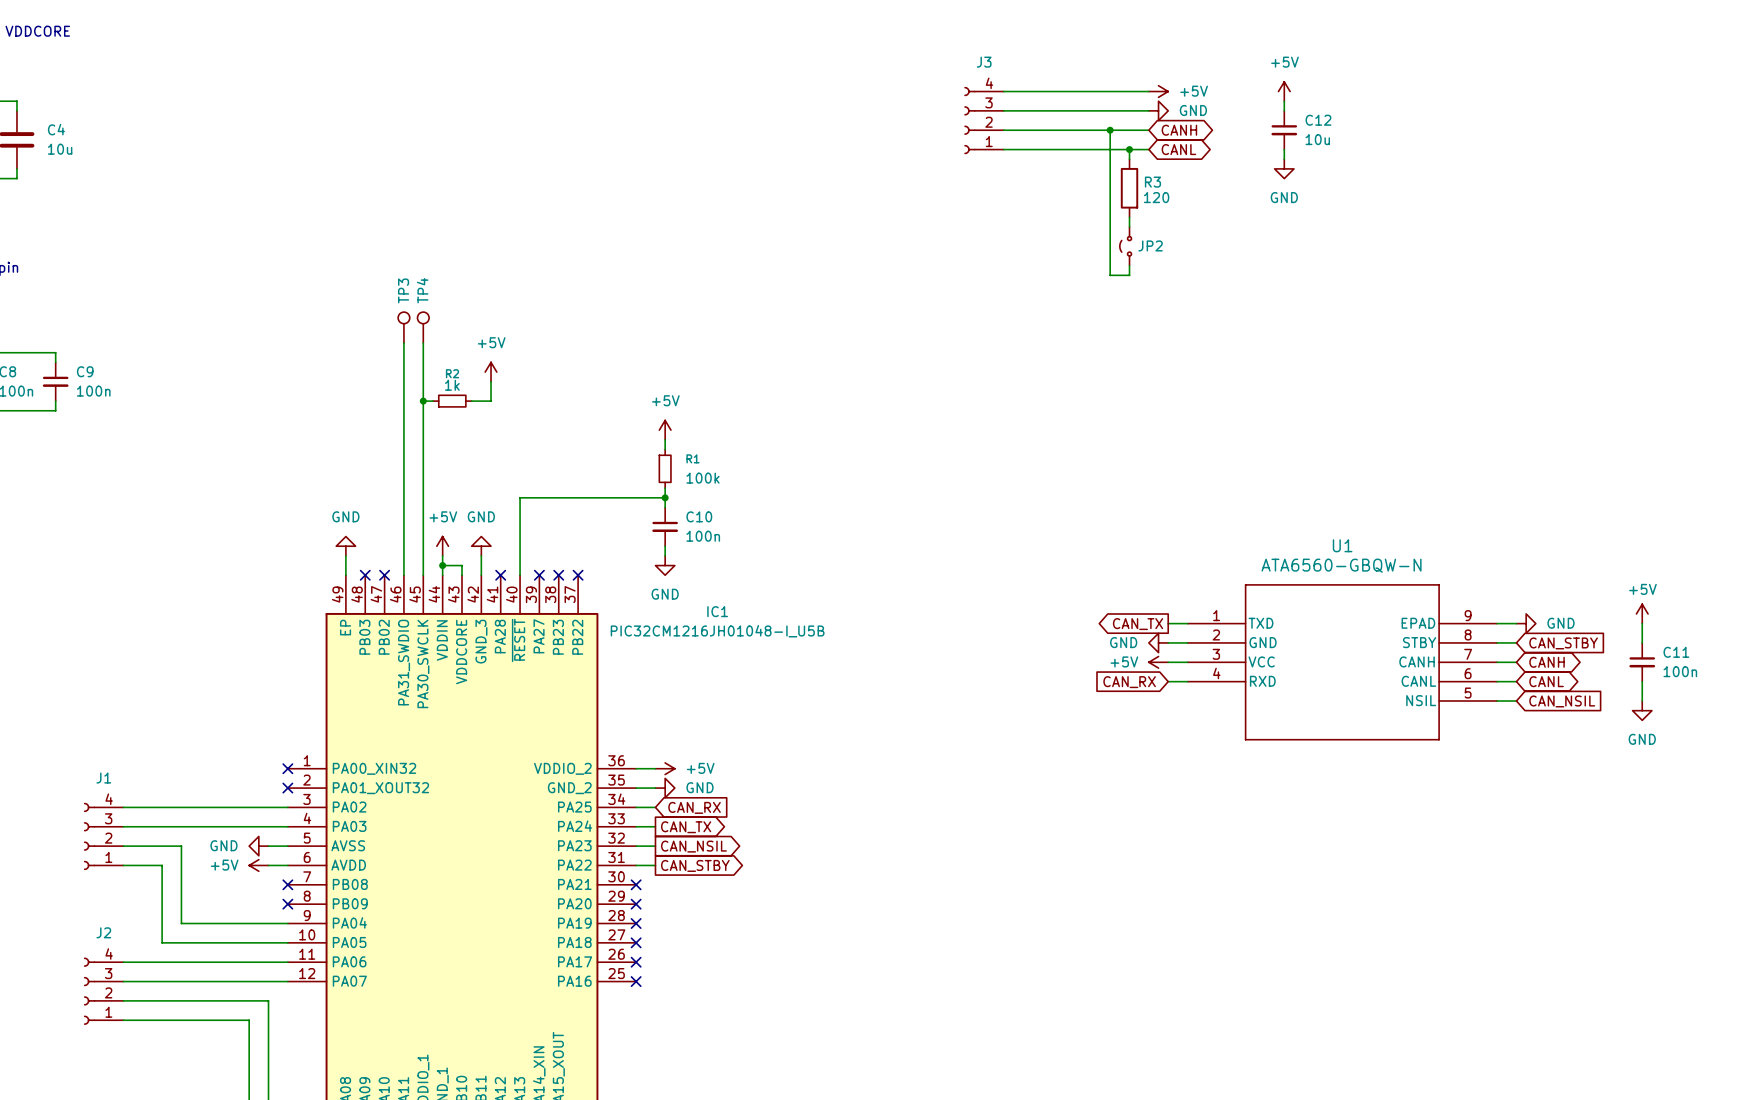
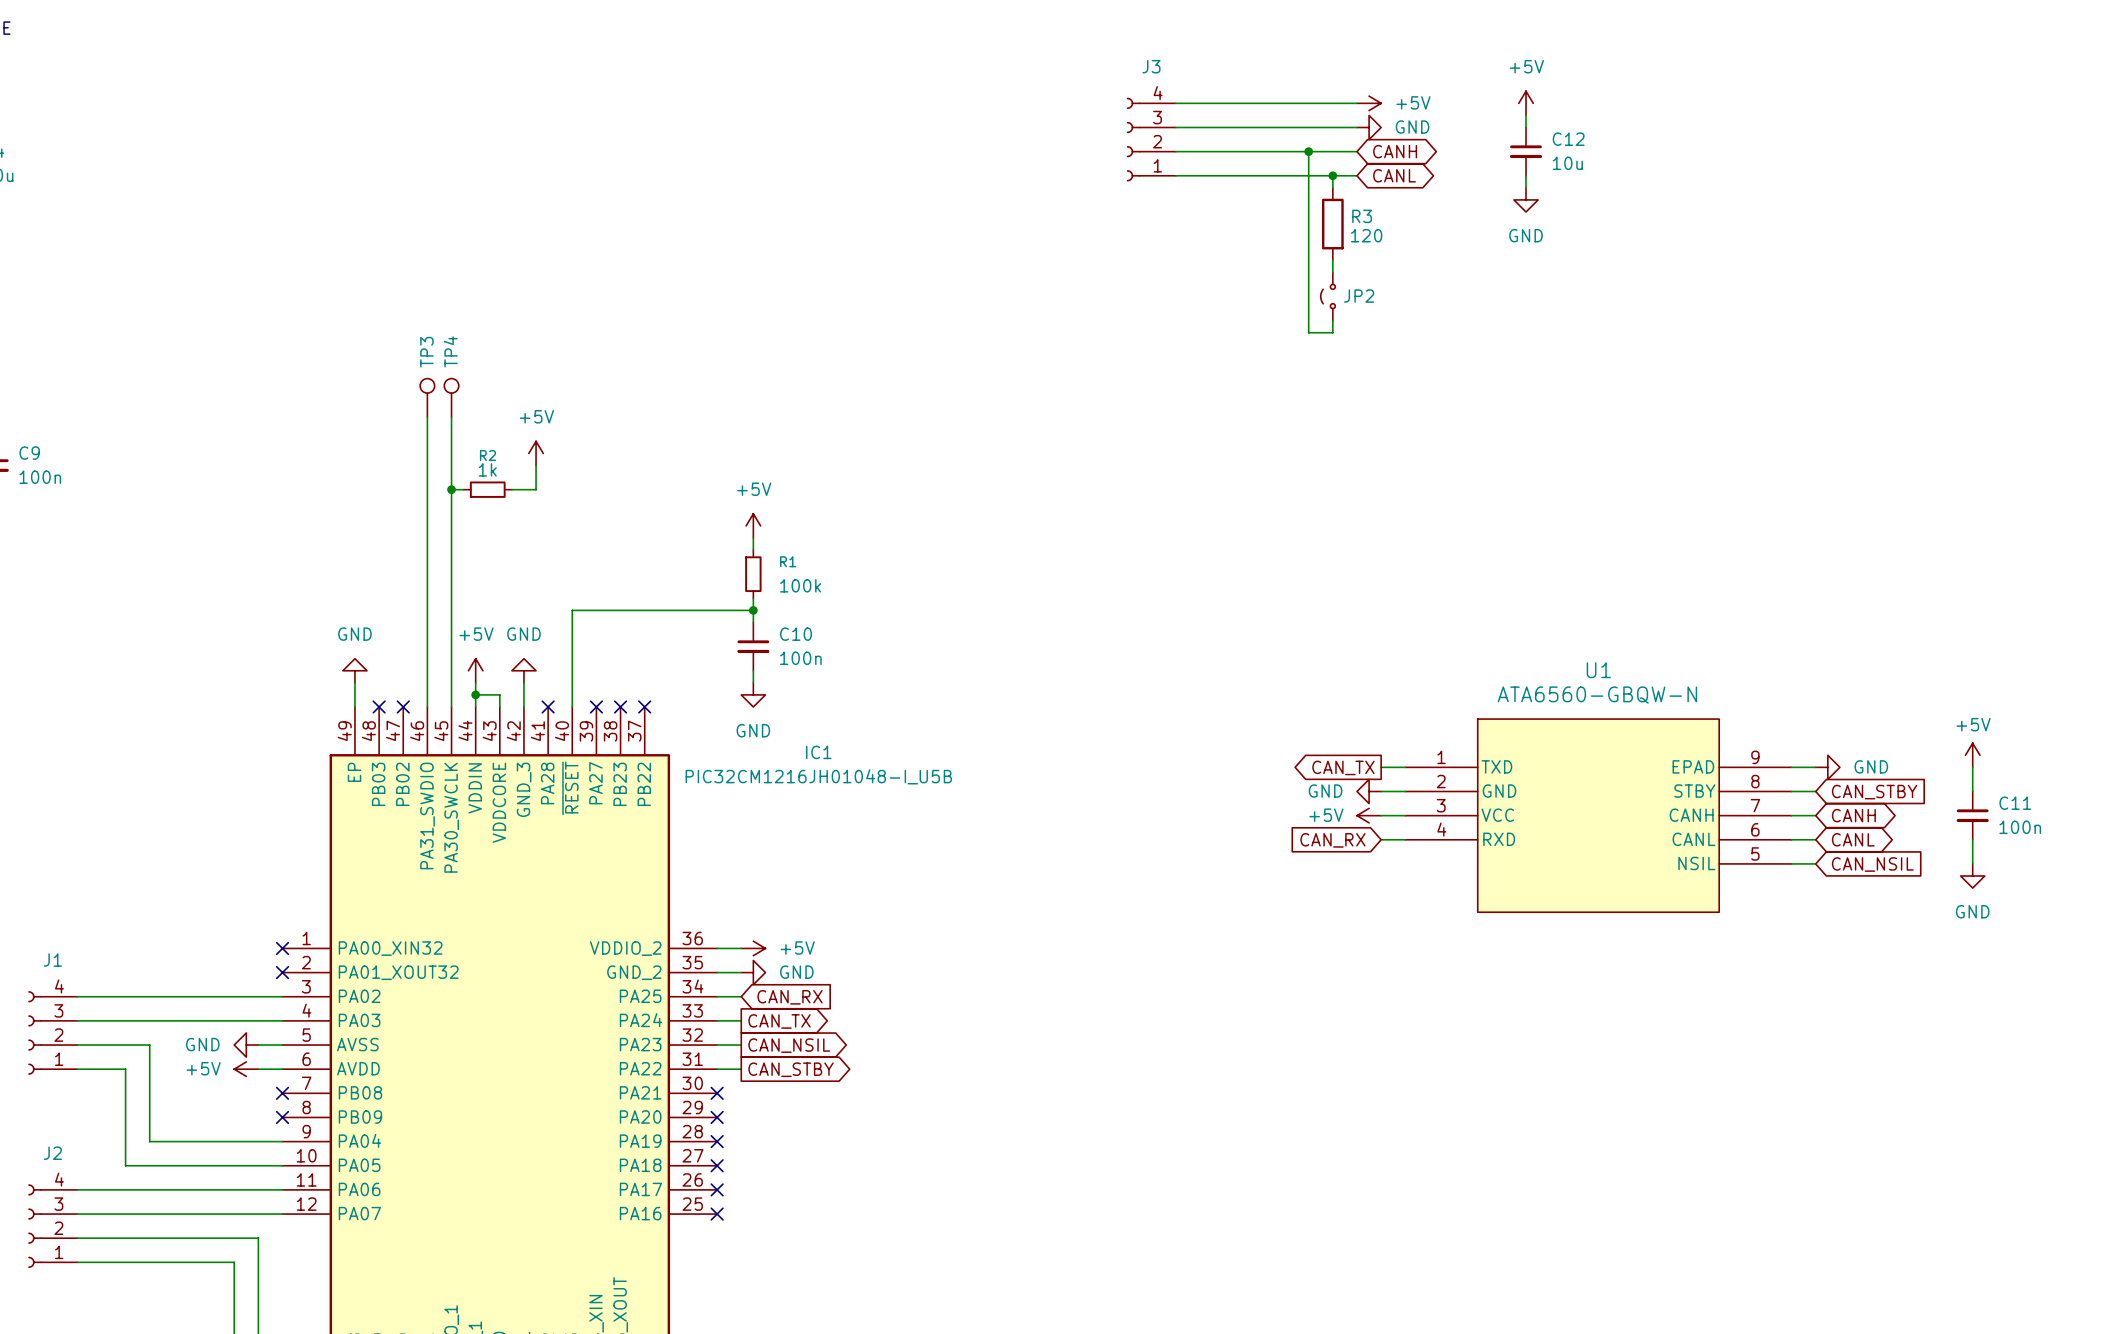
U1 symbol: [1187, 584, 1498, 741] -> [1405, 719, 1792, 913]

